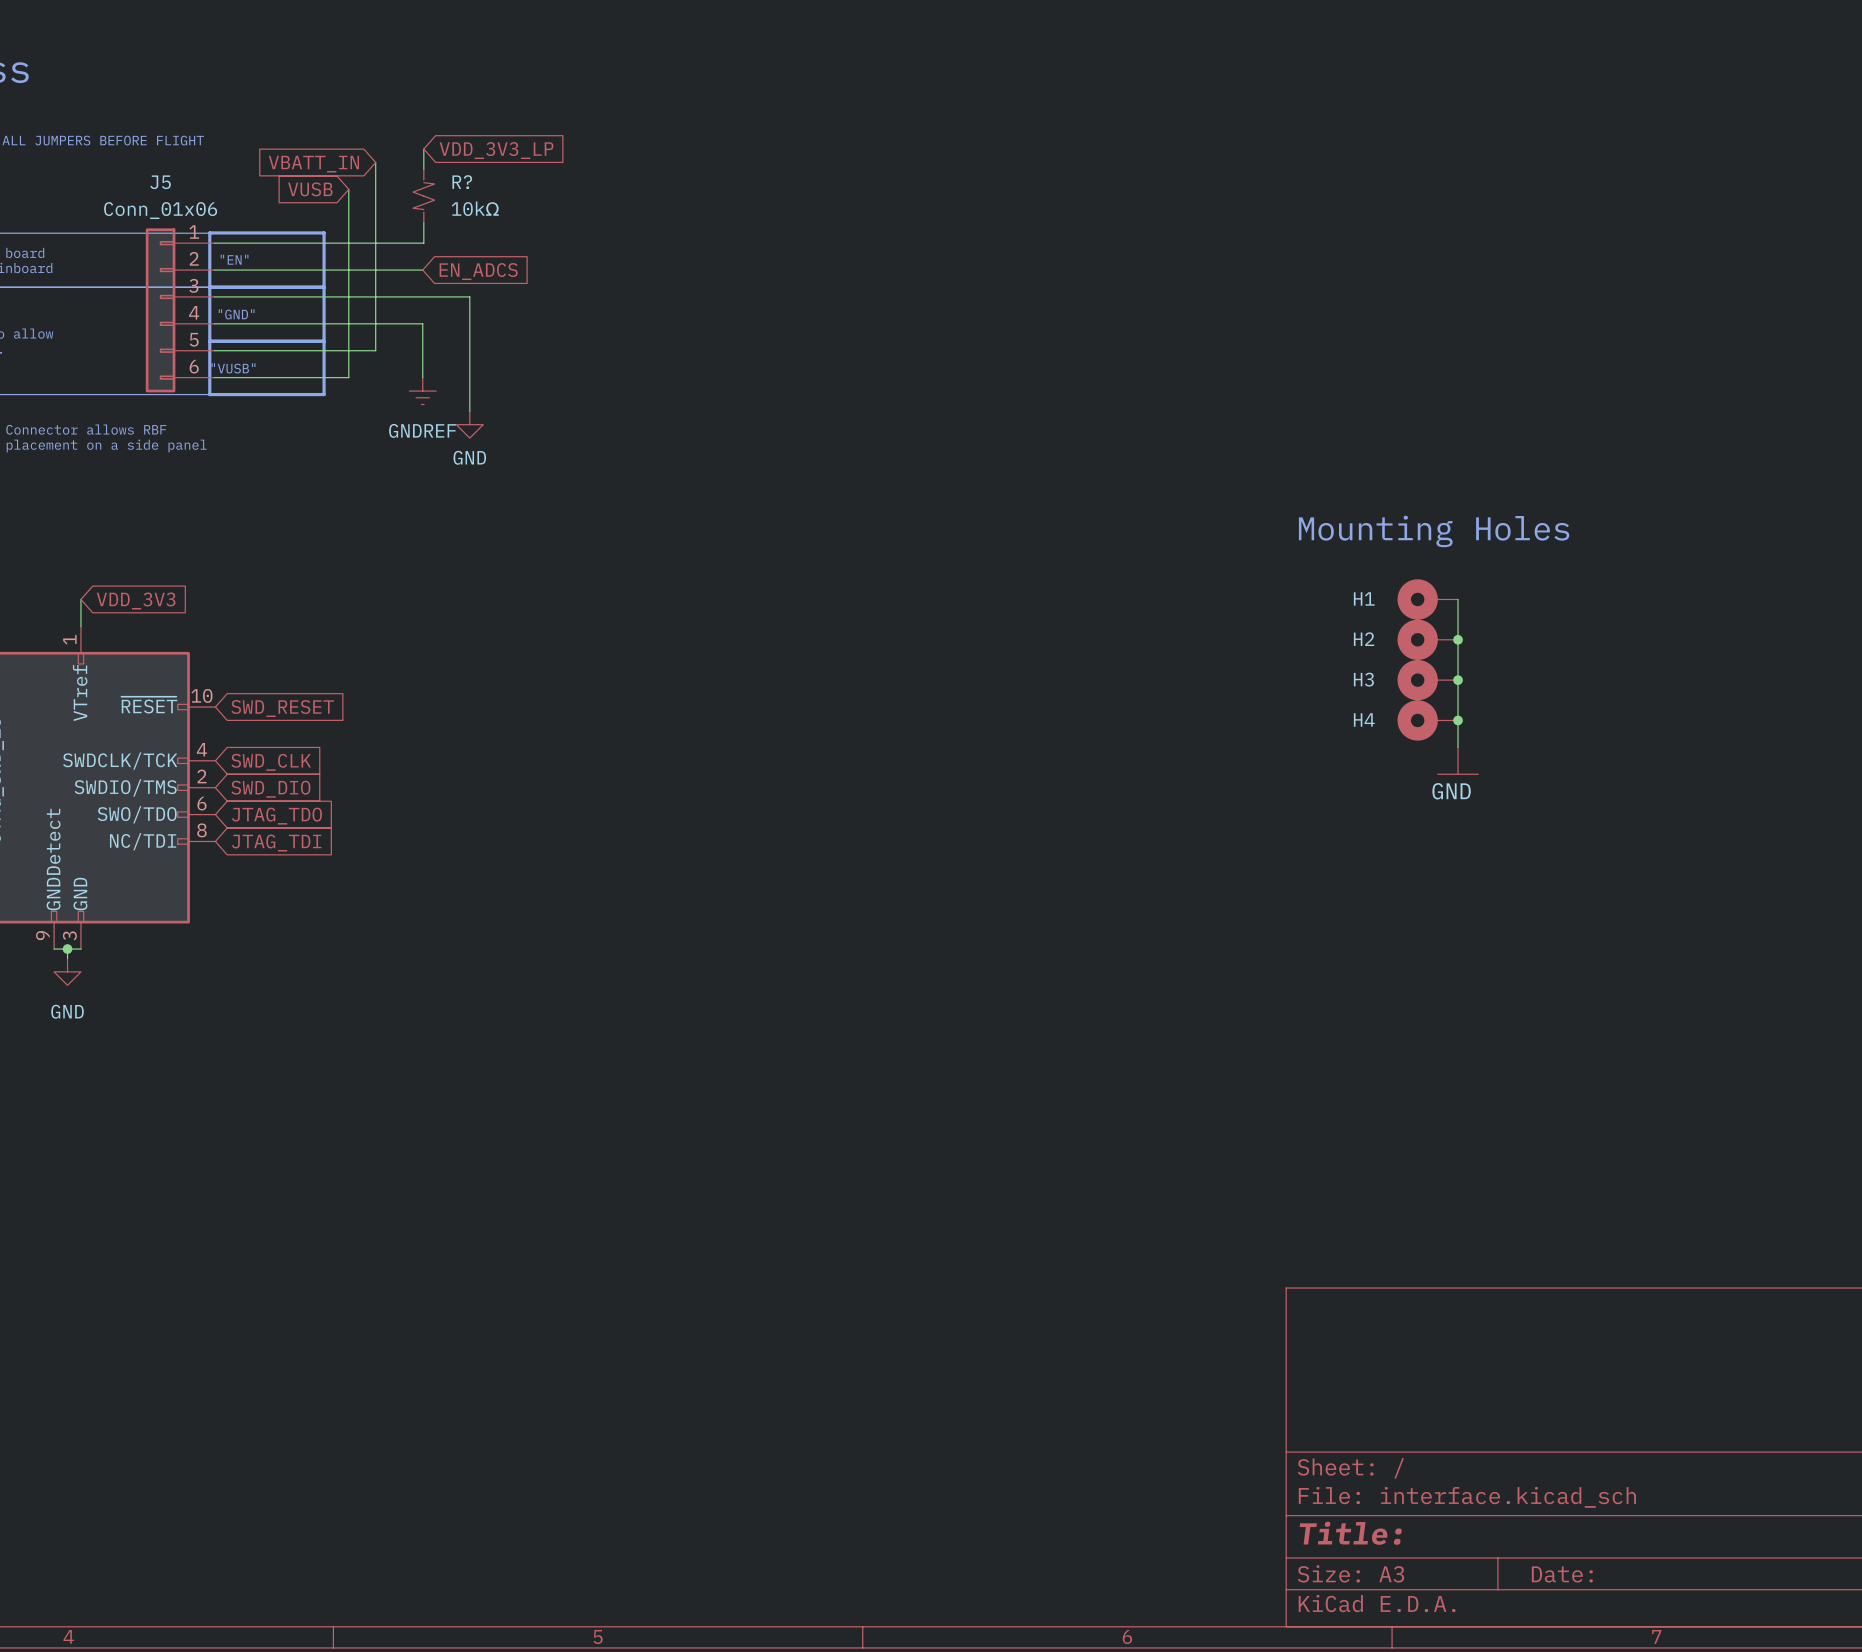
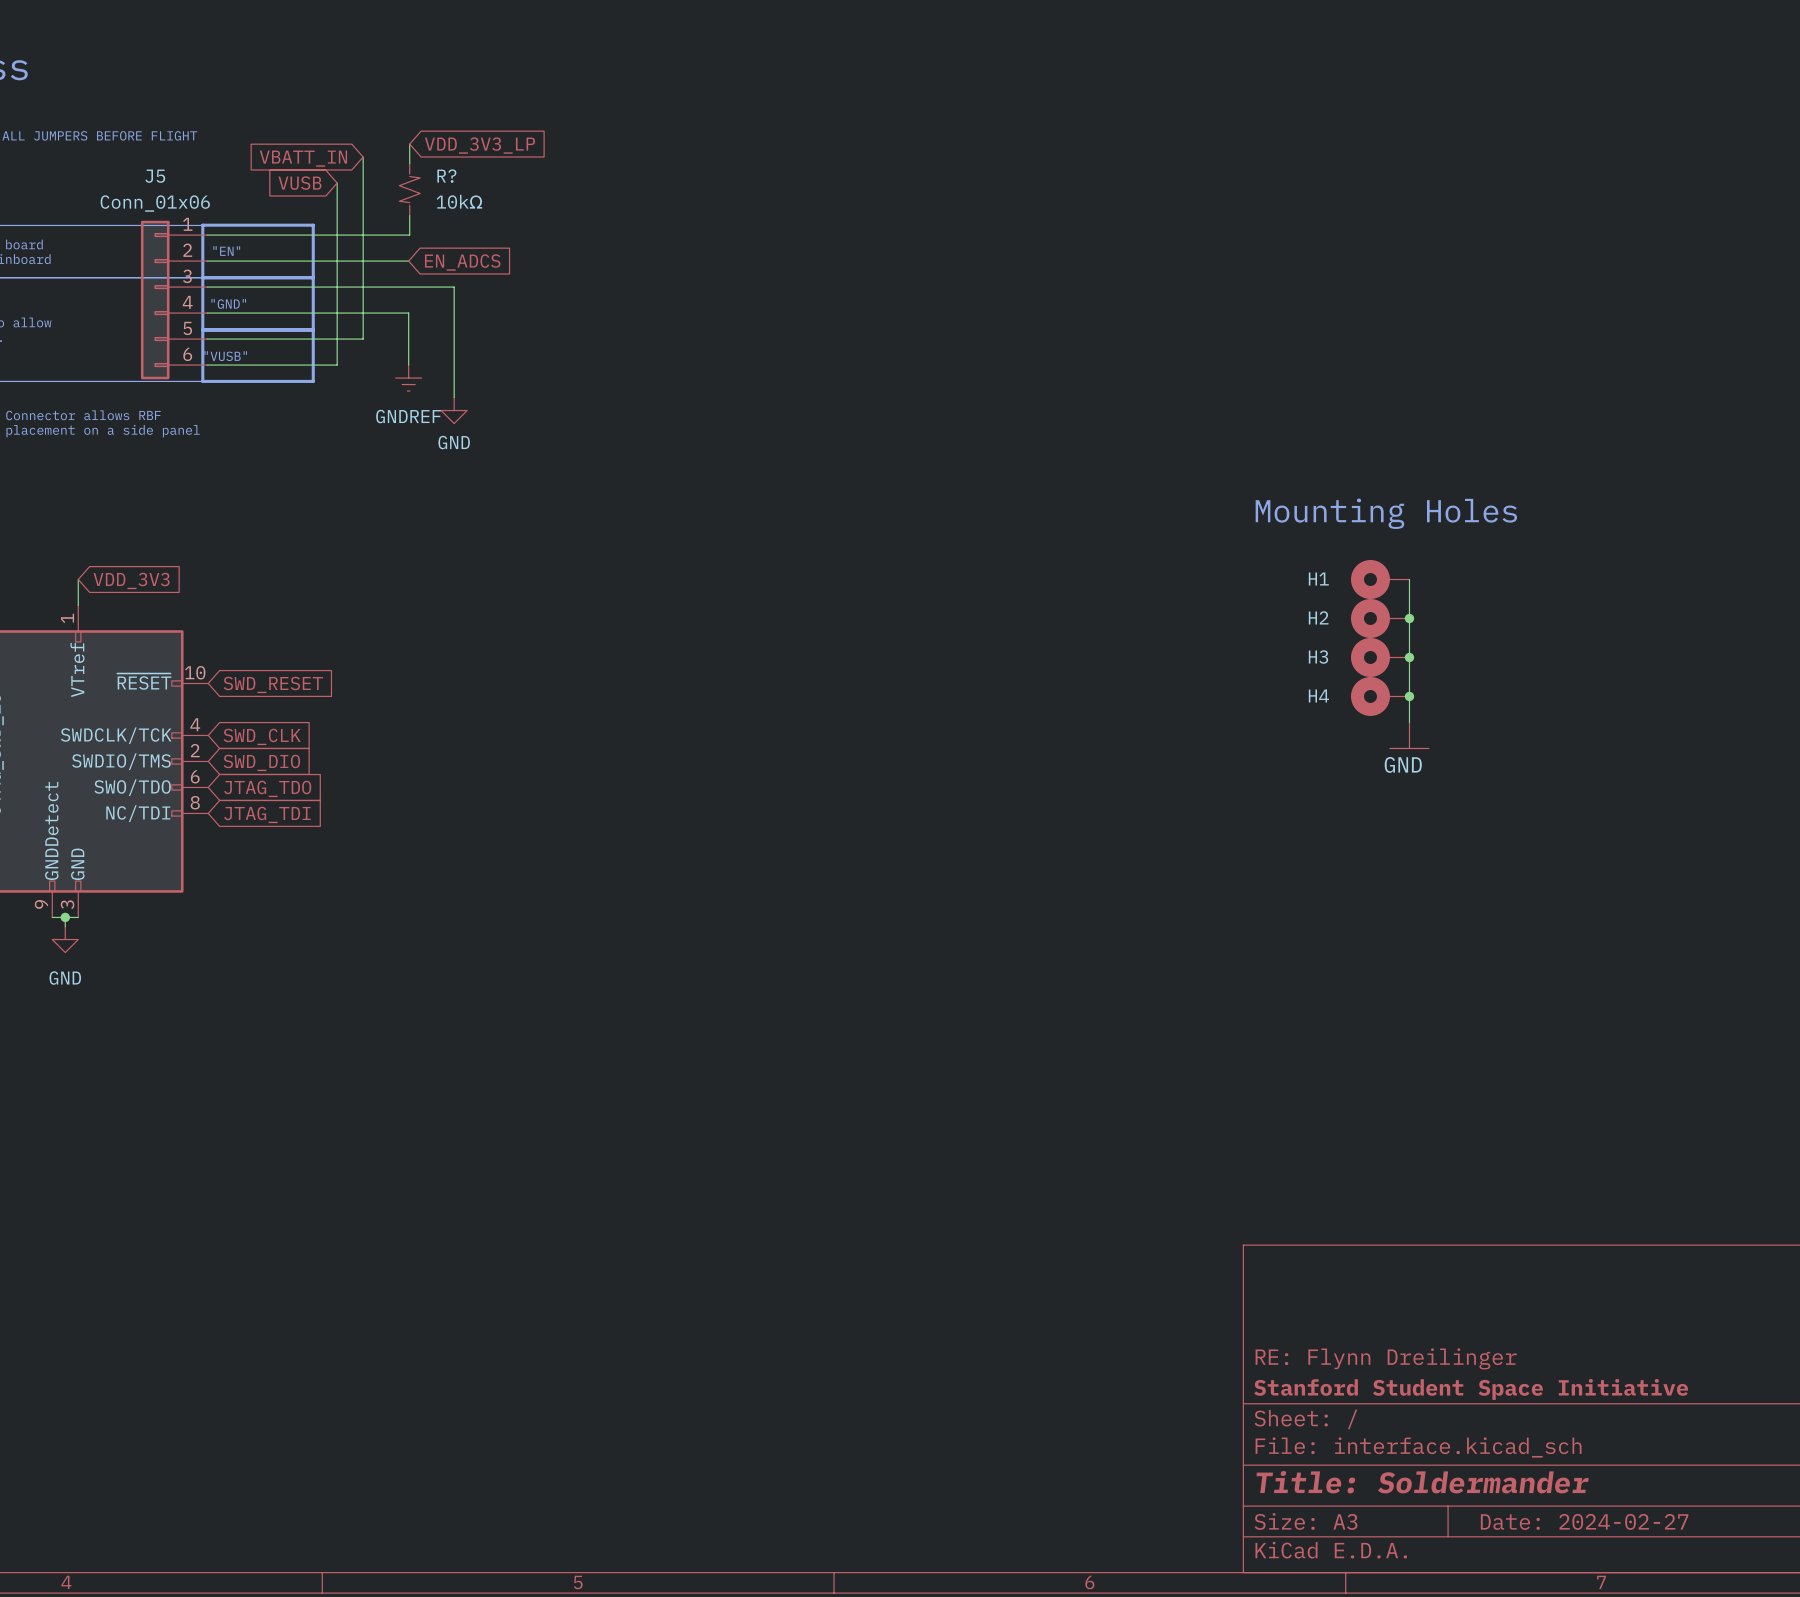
title block: none -> RE: Flynn Dreilinger (1386, 1358)
title block: none -> Stanford Student Space Initiative (1471, 1389)
title block: Title: (1350, 1533) -> Title: Soldermander (1422, 1482)
title block: Date: (1562, 1574) -> Date: 2024-02-27 (1584, 1521)

